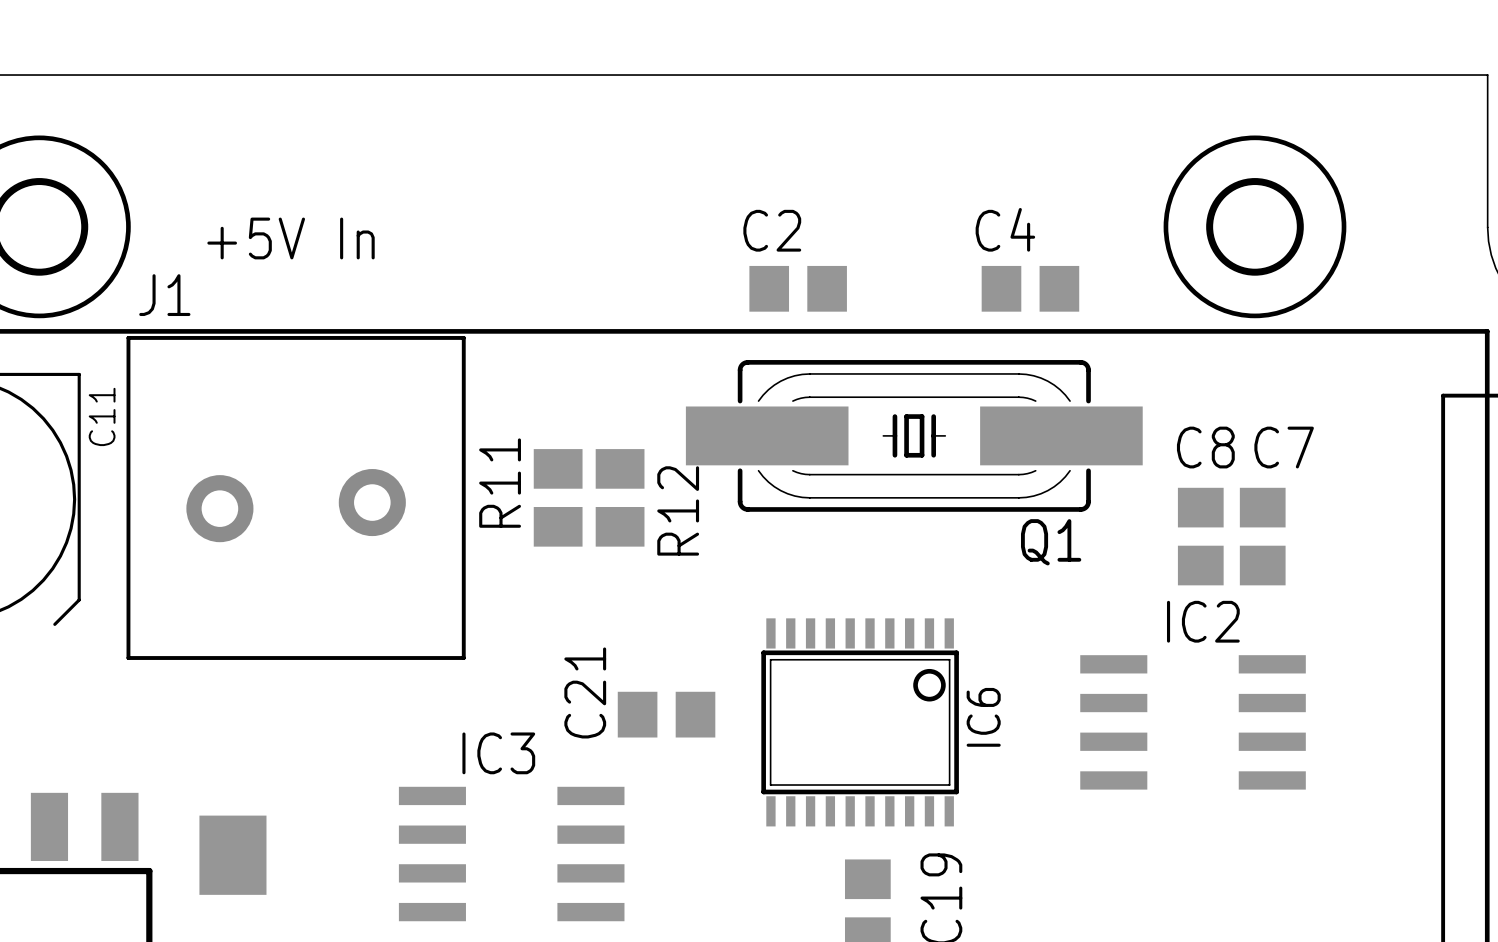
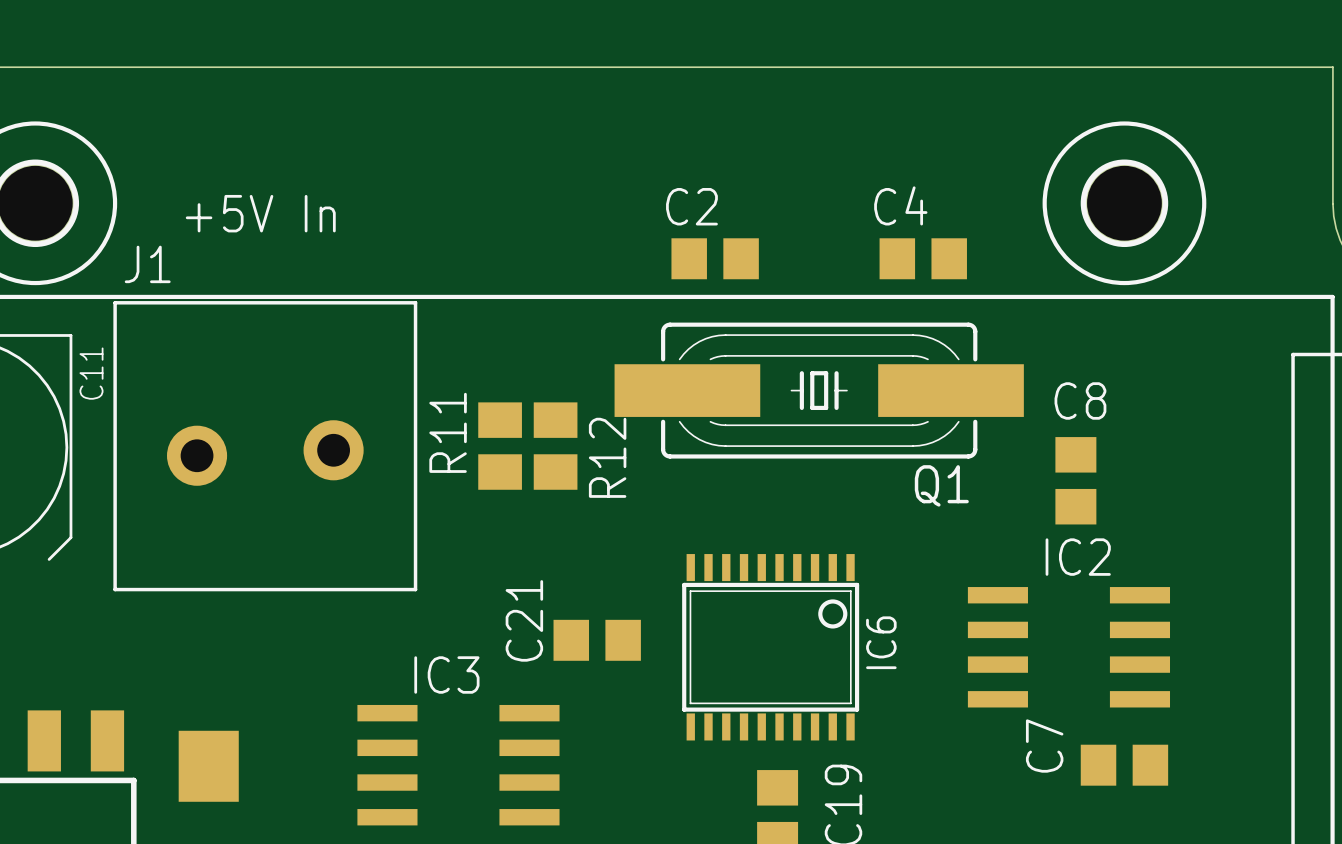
C7 name position: C7 (1284, 447) -> C7 (1044, 746)
C7 rotation: 0° (1262, 536) -> 90° clockwise (1124, 765)
C7 position: (1262, 536) -> (1124, 765)

